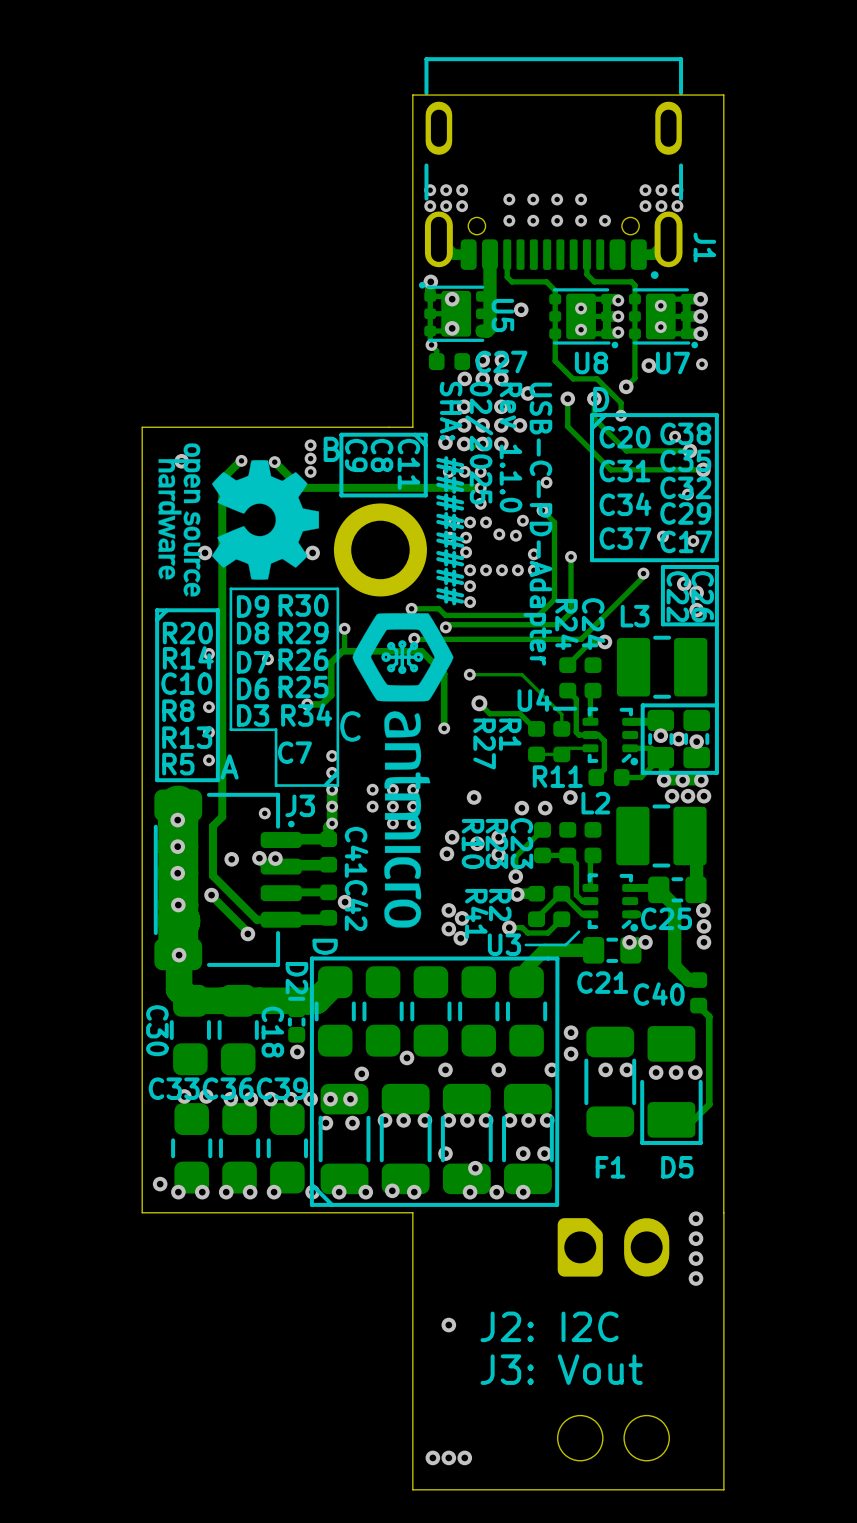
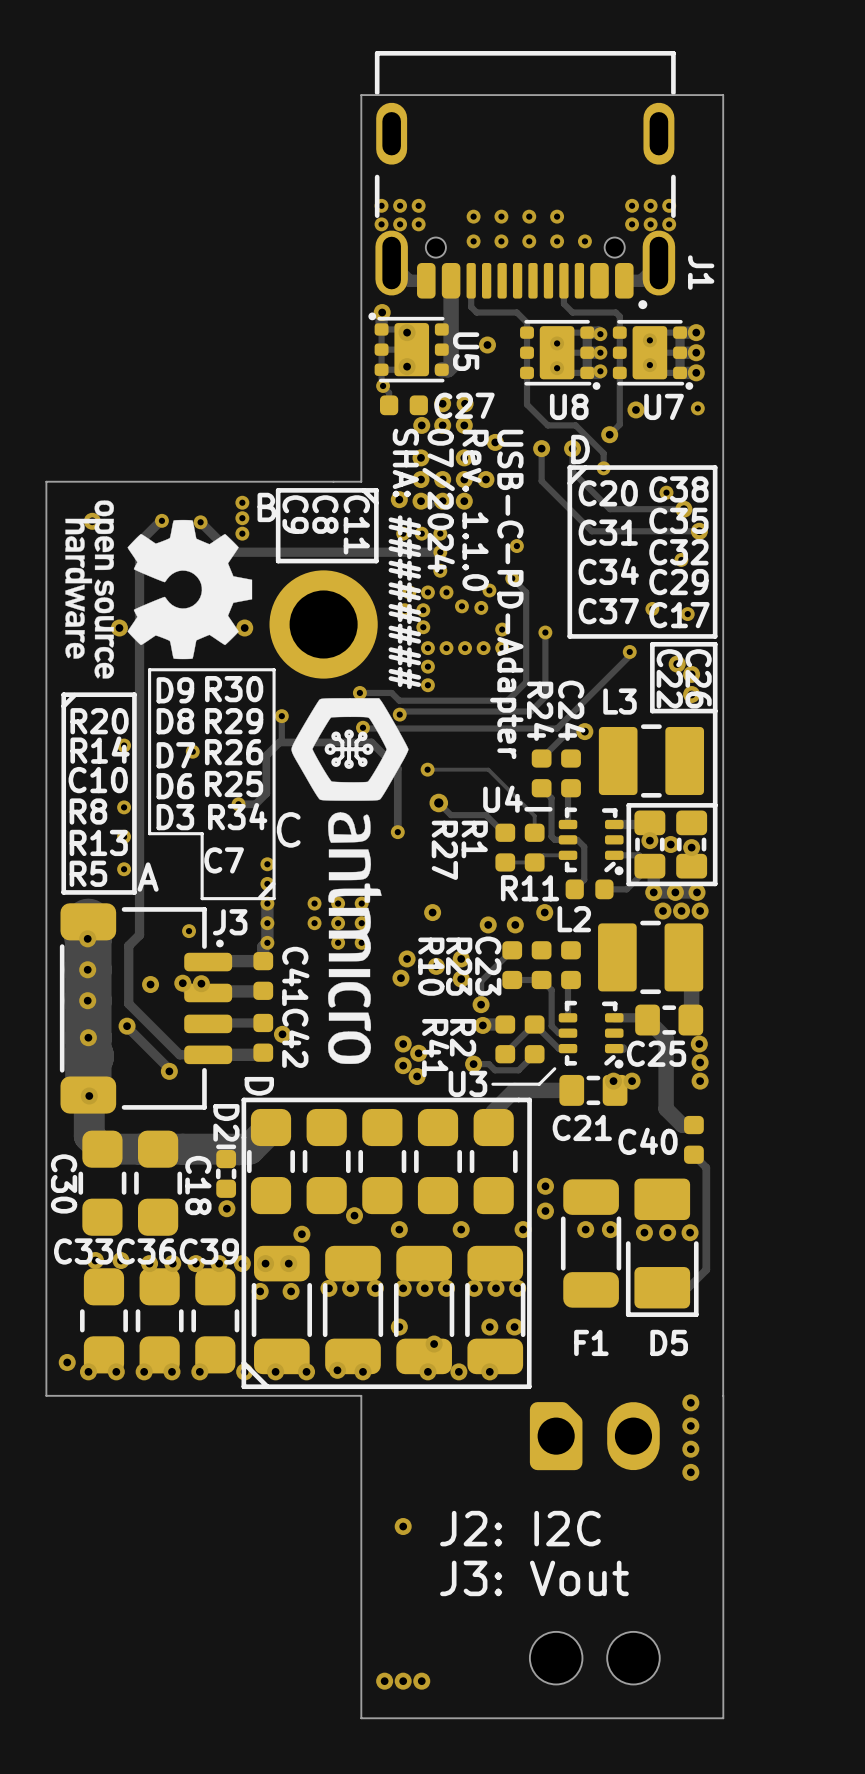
text: 02/2025 (479, 443) -> 07/2024 (438, 500)
text: Rev 1.1.0 (511, 447) -> Rev. 1.1.0 (475, 510)

